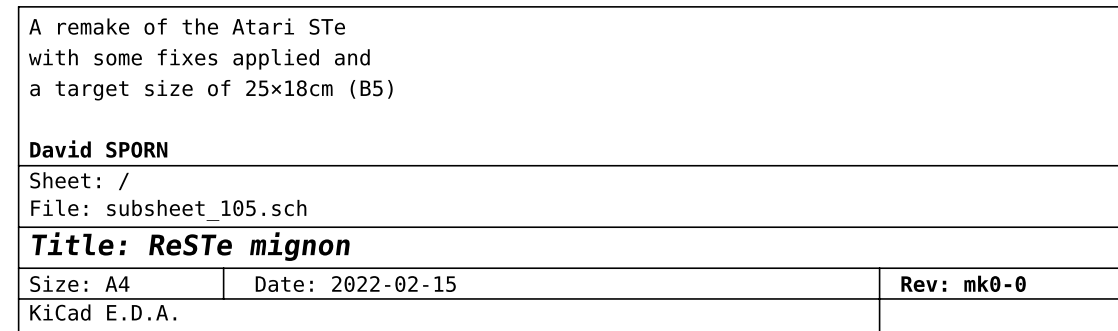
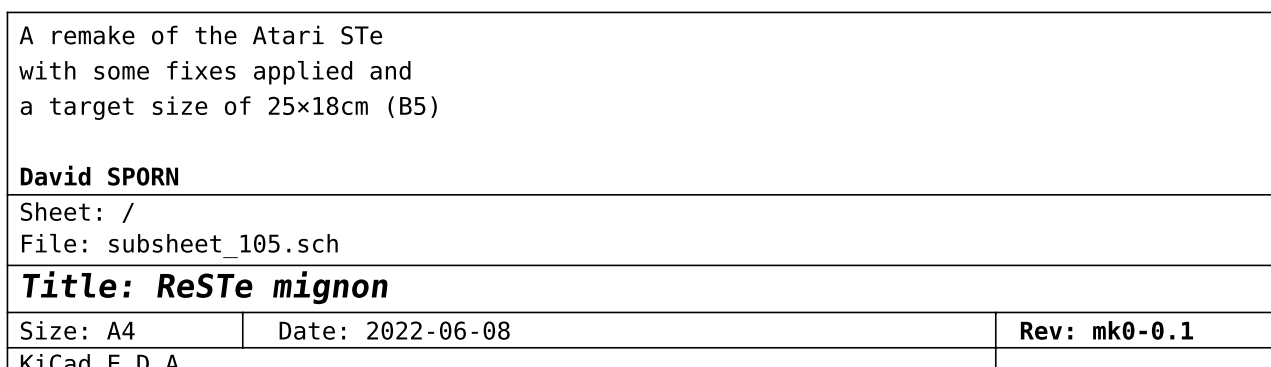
title block: Rev: mk0-0 (963, 283) -> Rev: mk0-0.1 (1106, 330)
title block: Date: 2022-02-15 (355, 284) -> Date: 2022-06-08 (394, 330)

